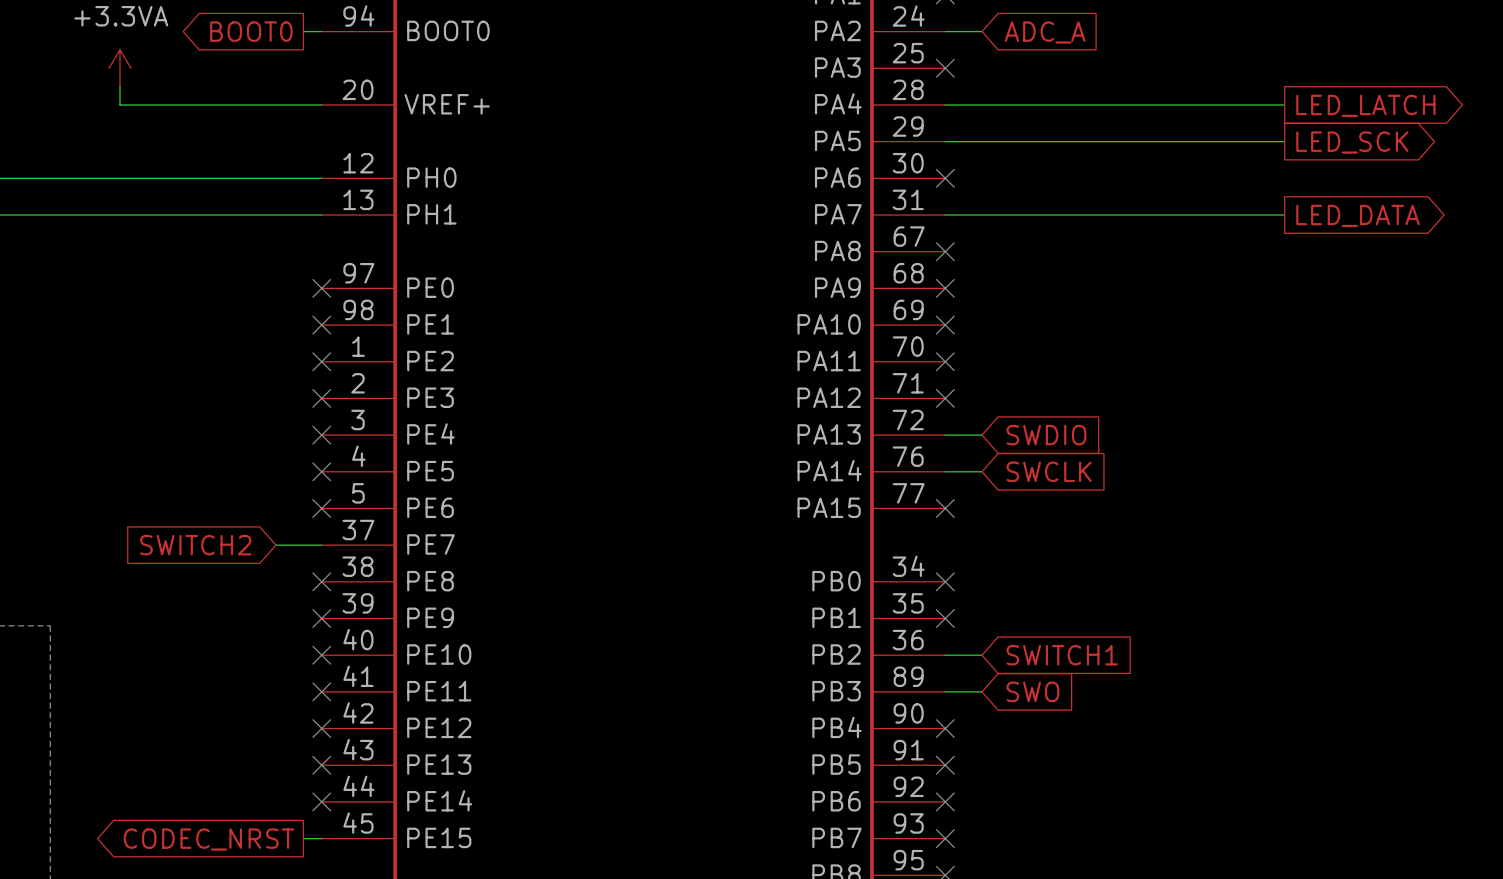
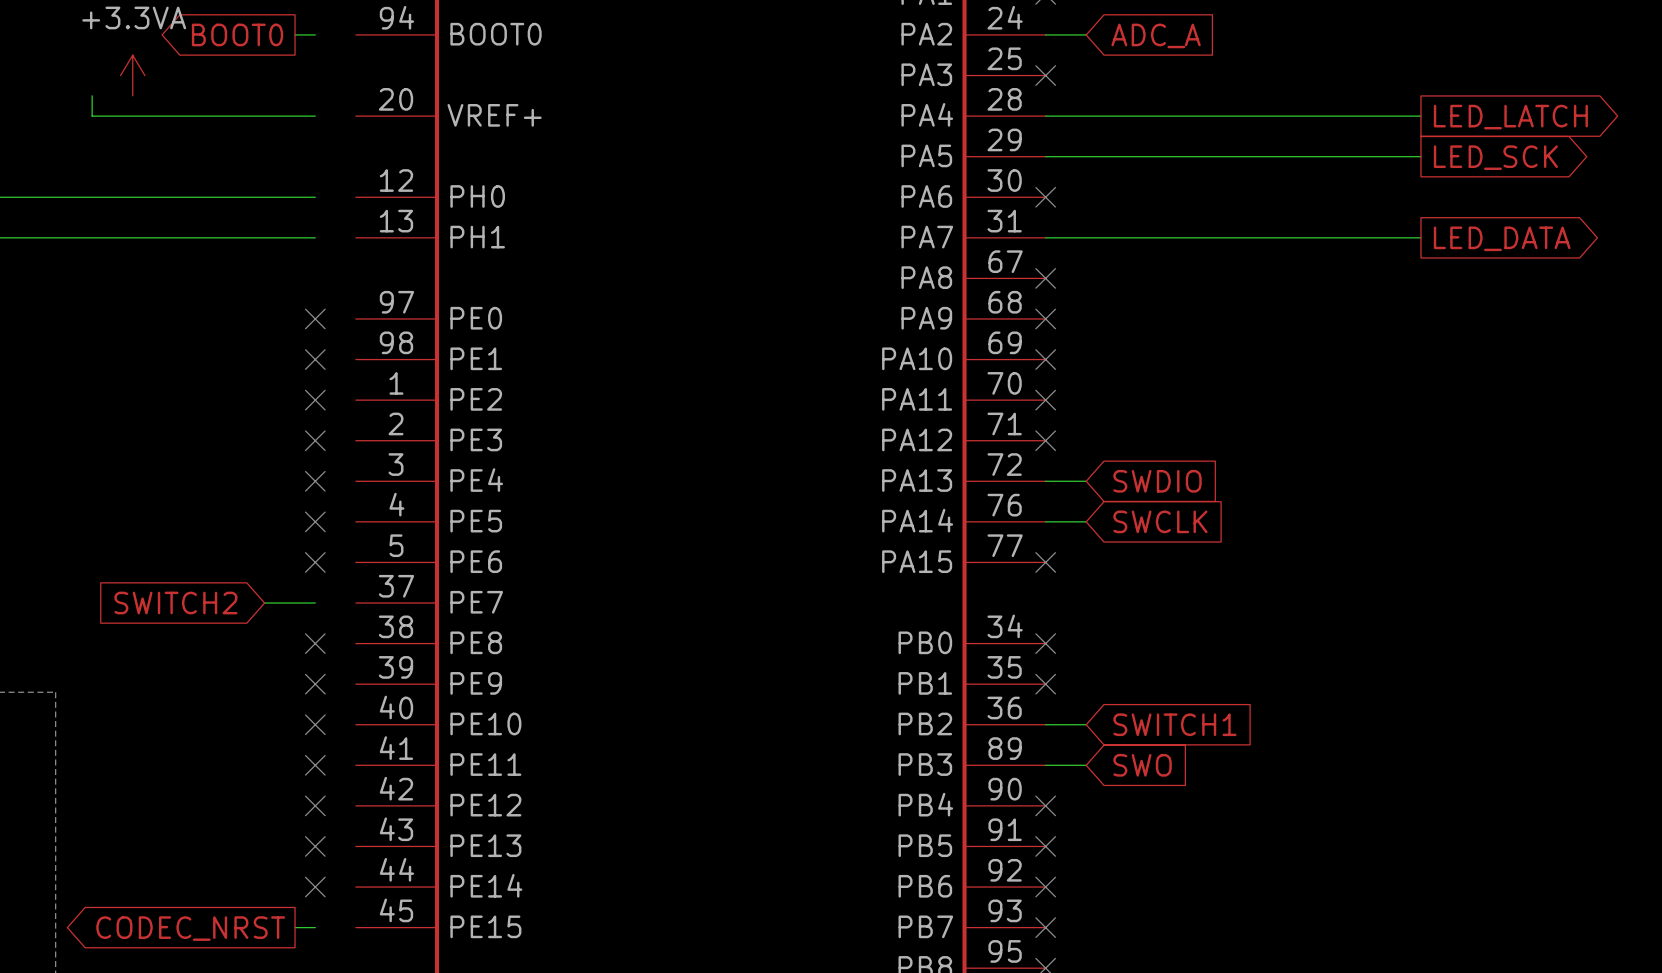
global label position: BOOT0 (251, 31) -> BOOT0 (237, 34)
wire: (303, 31) (321, 31) -> (295, 34) (315, 34)
wire: (119, 86) (119, 104) -> (92, 95) (92, 116) (132, 116)
wire: (285, 104) (321, 104) -> none
wire: (285, 178) (321, 178) -> none
wire: (285, 215) (321, 215) -> none
no-connect mark: none -> (315, 318)
no-connect mark: (321, 288) -> none
no-connect mark: none -> (315, 359)
no-connect mark: (321, 325) -> none
no-connect mark: none -> (315, 400)
no-connect mark: (321, 361) -> none
no-connect mark: none -> (315, 440)
no-connect mark: (321, 398) -> none
no-connect mark: none -> (315, 481)
no-connect mark: (321, 435) -> none
no-connect mark: none -> (315, 521)
no-connect mark: (321, 471) -> none
no-connect mark: none -> (315, 562)
no-connect mark: (321, 508) -> none
global label position: SWITCH2 (195, 545) -> SWITCH2 (175, 603)
wire: (285, 545) (321, 545) -> (264, 603) (305, 603)
no-connect mark: none -> (315, 643)
no-connect mark: (321, 581) -> none
no-connect mark: none -> (315, 684)
no-connect mark: (321, 618) -> none
no-connect mark: none -> (315, 724)
no-connect mark: (321, 655) -> none
no-connect mark: none -> (315, 765)
no-connect mark: (321, 691) -> none
no-connect mark: none -> (315, 805)
no-connect mark: (321, 728) -> none
no-connect mark: none -> (315, 846)
no-connect mark: (321, 765) -> none
no-connect mark: none -> (315, 887)
no-connect mark: (321, 801) -> none
wire: (303, 838) (321, 838) -> (295, 927) (315, 927)
global label position: CODEC_NRST (209, 839) -> CODEC_NRST (190, 928)

